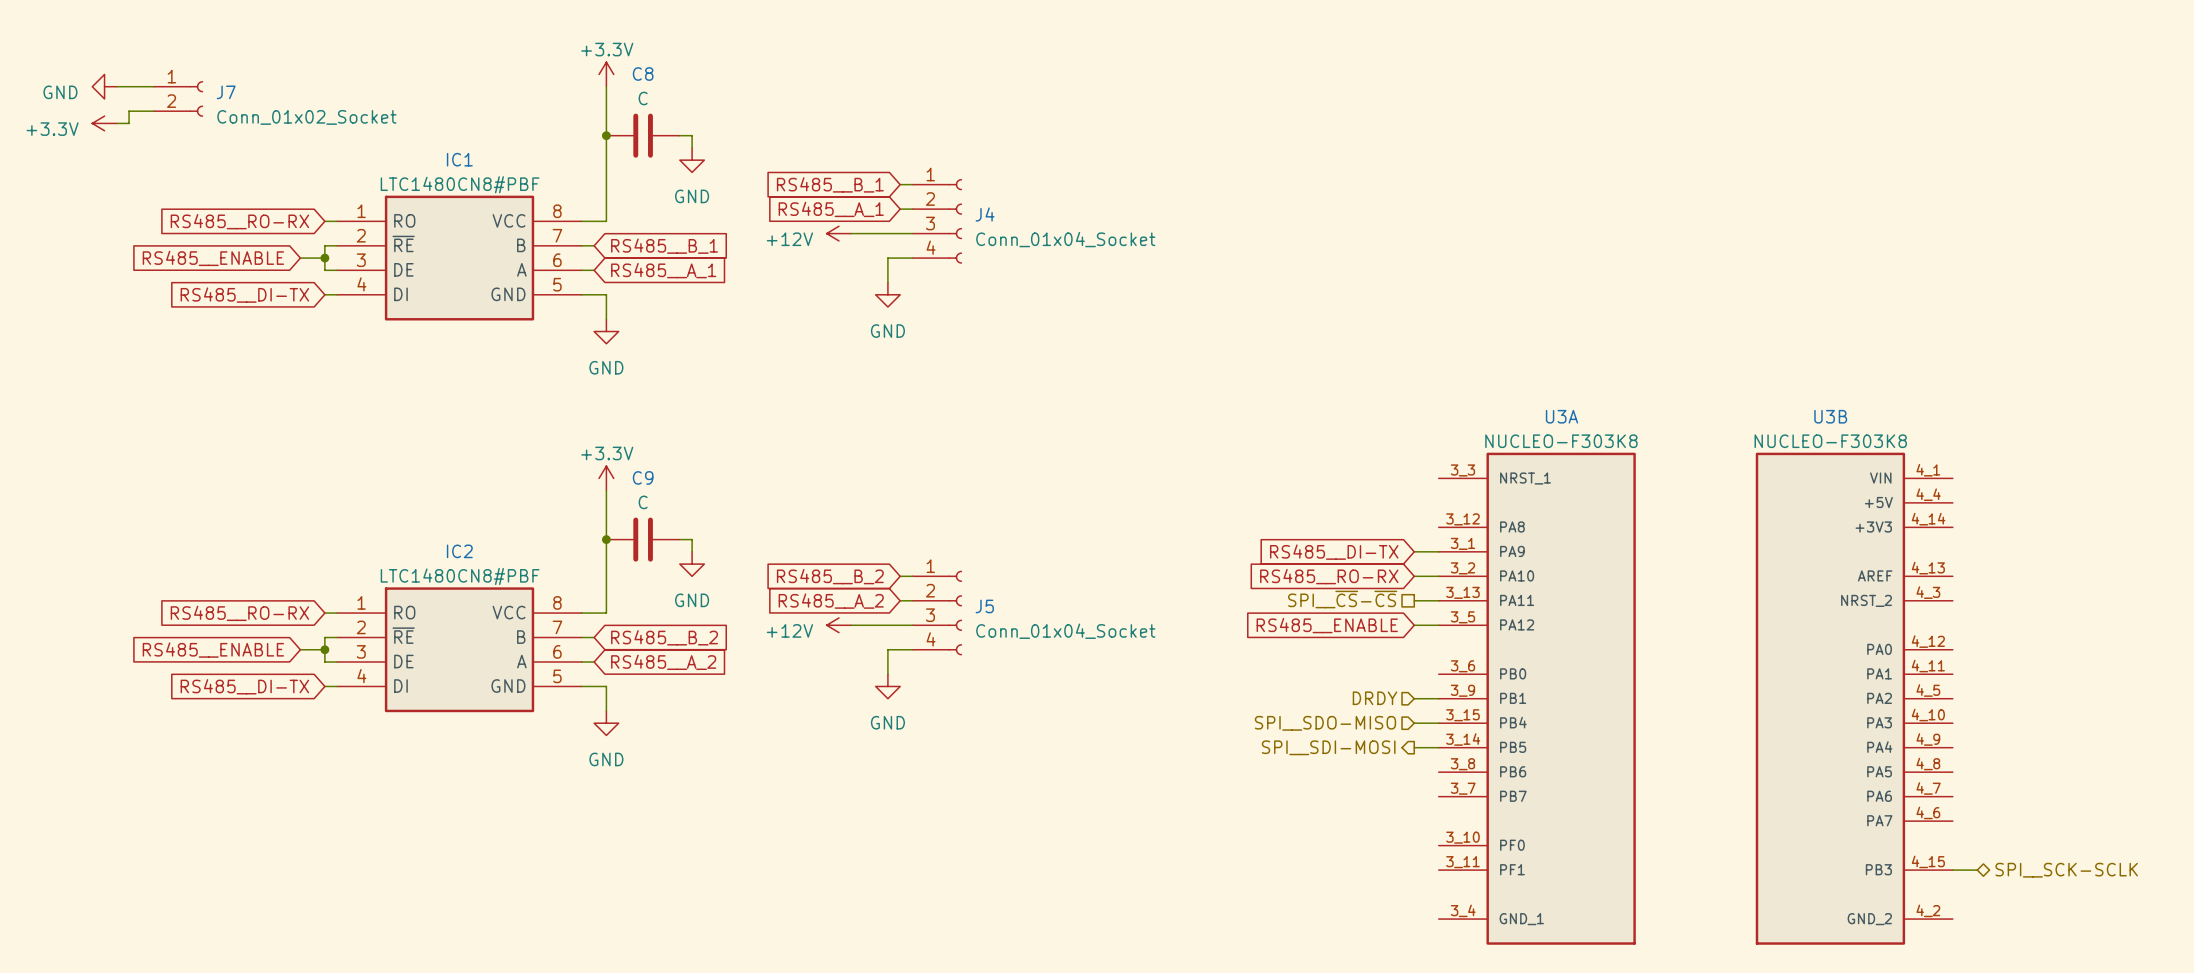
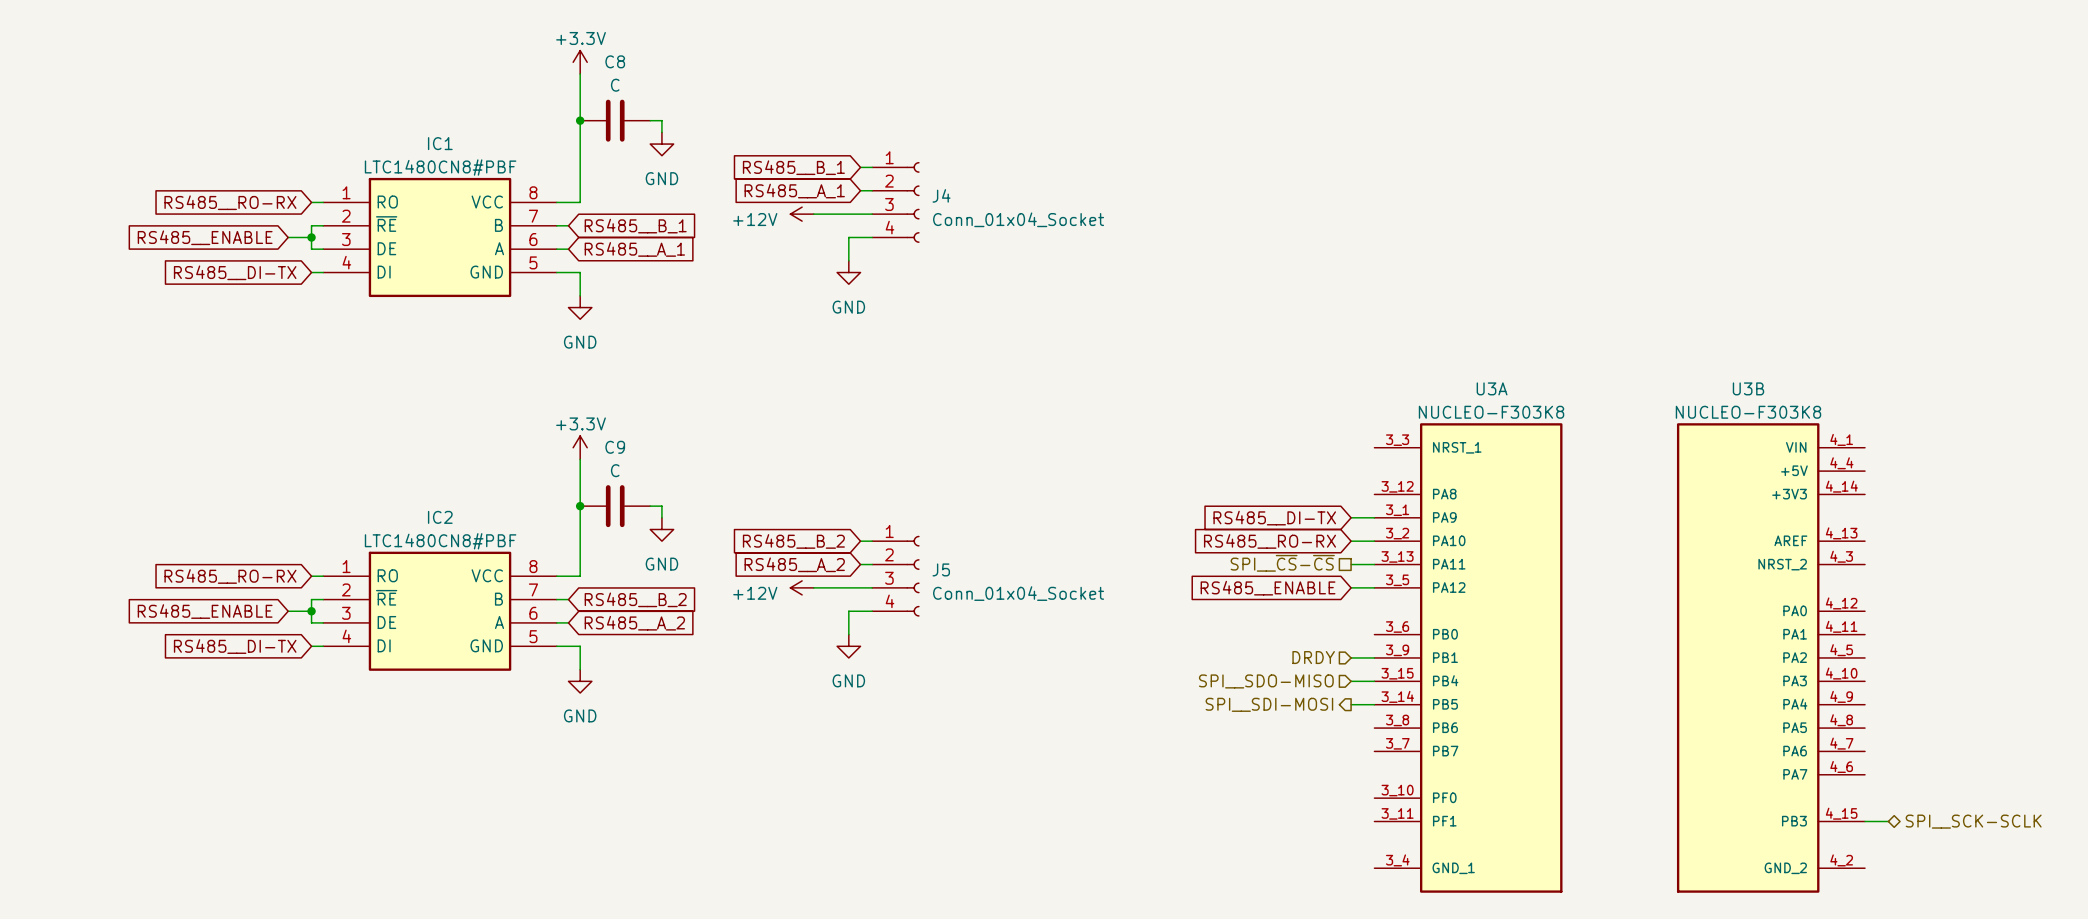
power symbol: GND (104, 86) -> none
wire: (116, 86) (153, 86) -> none
J7: Conn_01x02_Socket (178, 98) -> none
wire: (153, 111) (129, 111) (129, 123) (116, 123) -> none
power symbol: +3.3V (104, 123) -> none

